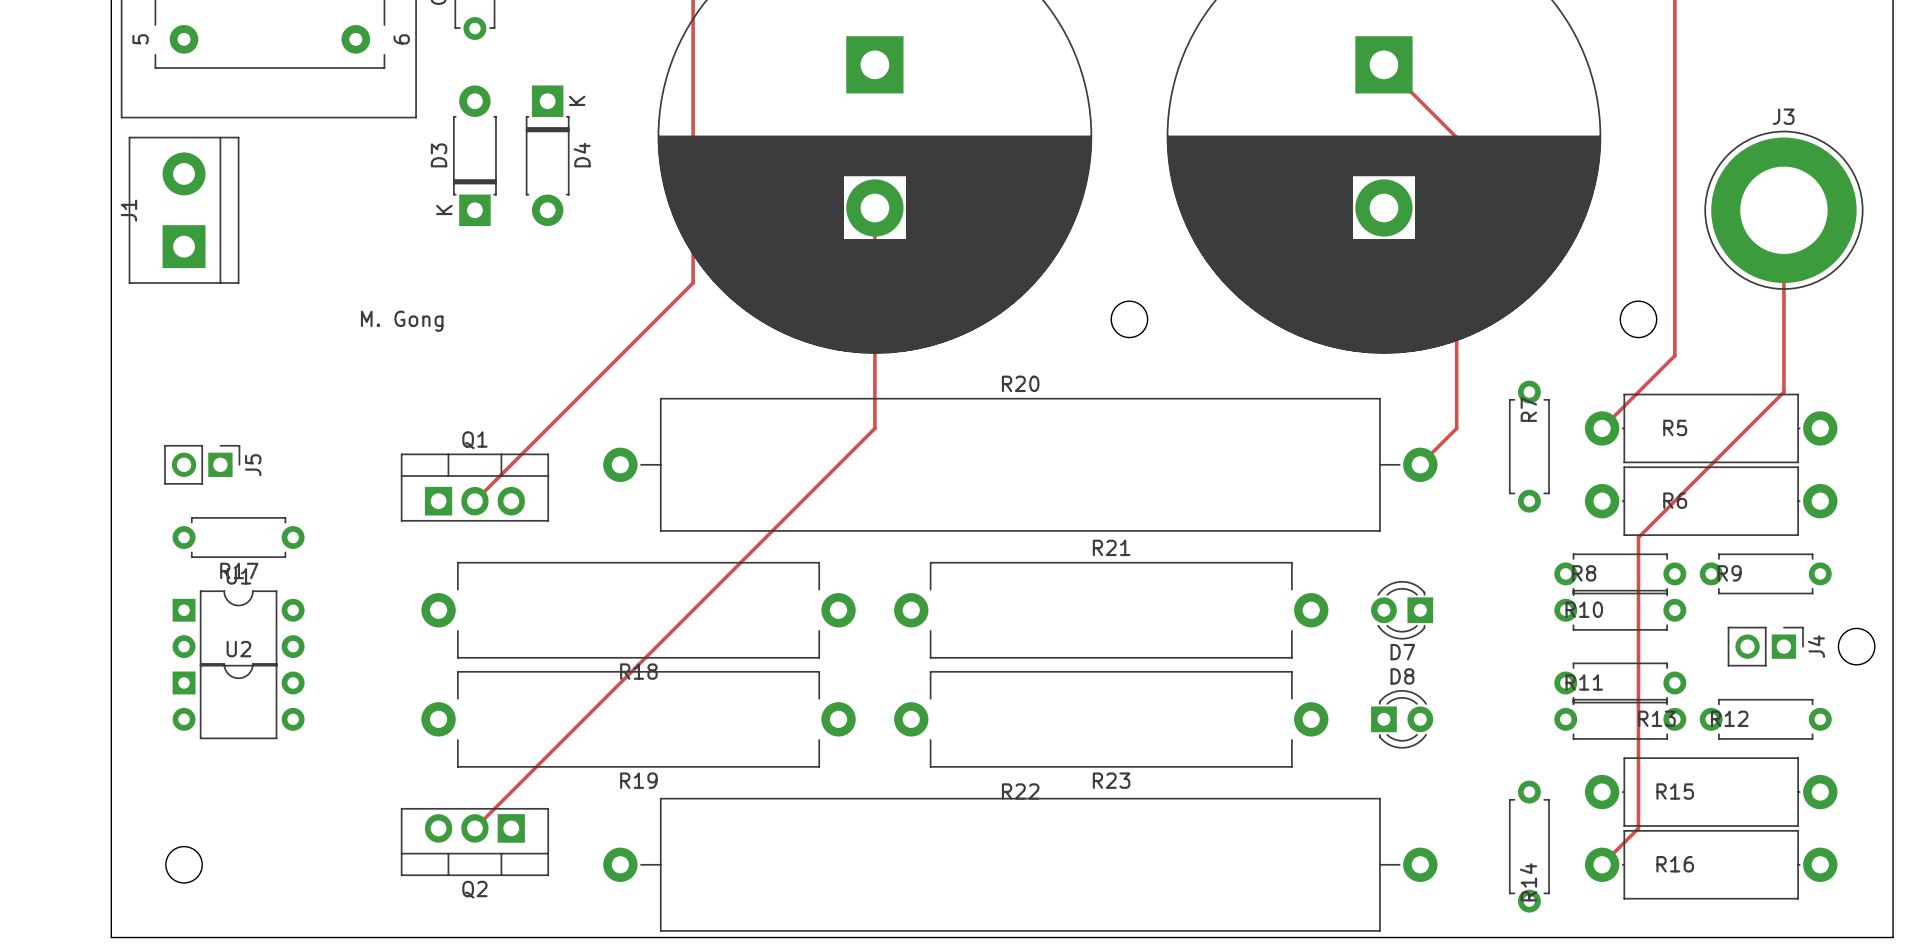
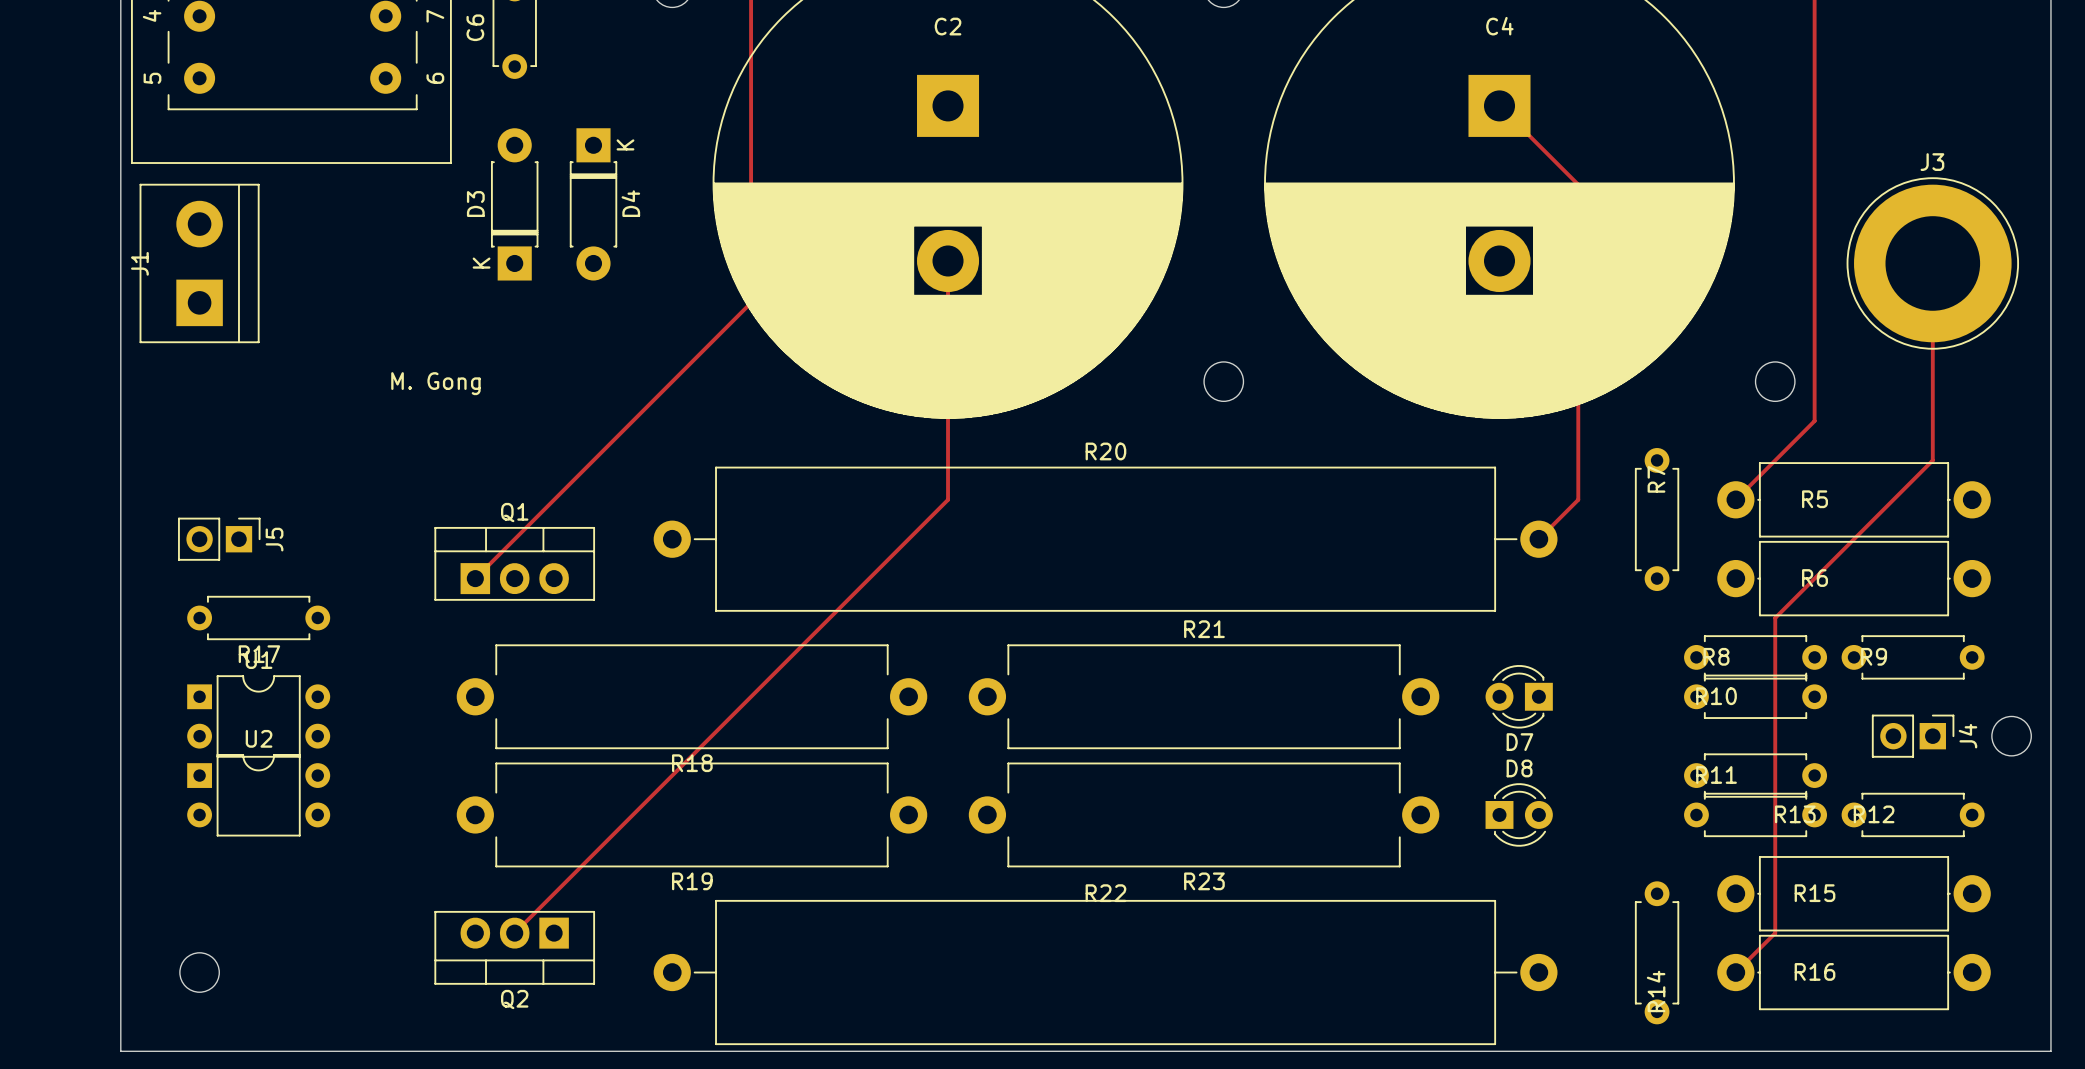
track: (693, 246) (693, 283) (474, 501) -> (751, 302) (475, 578)

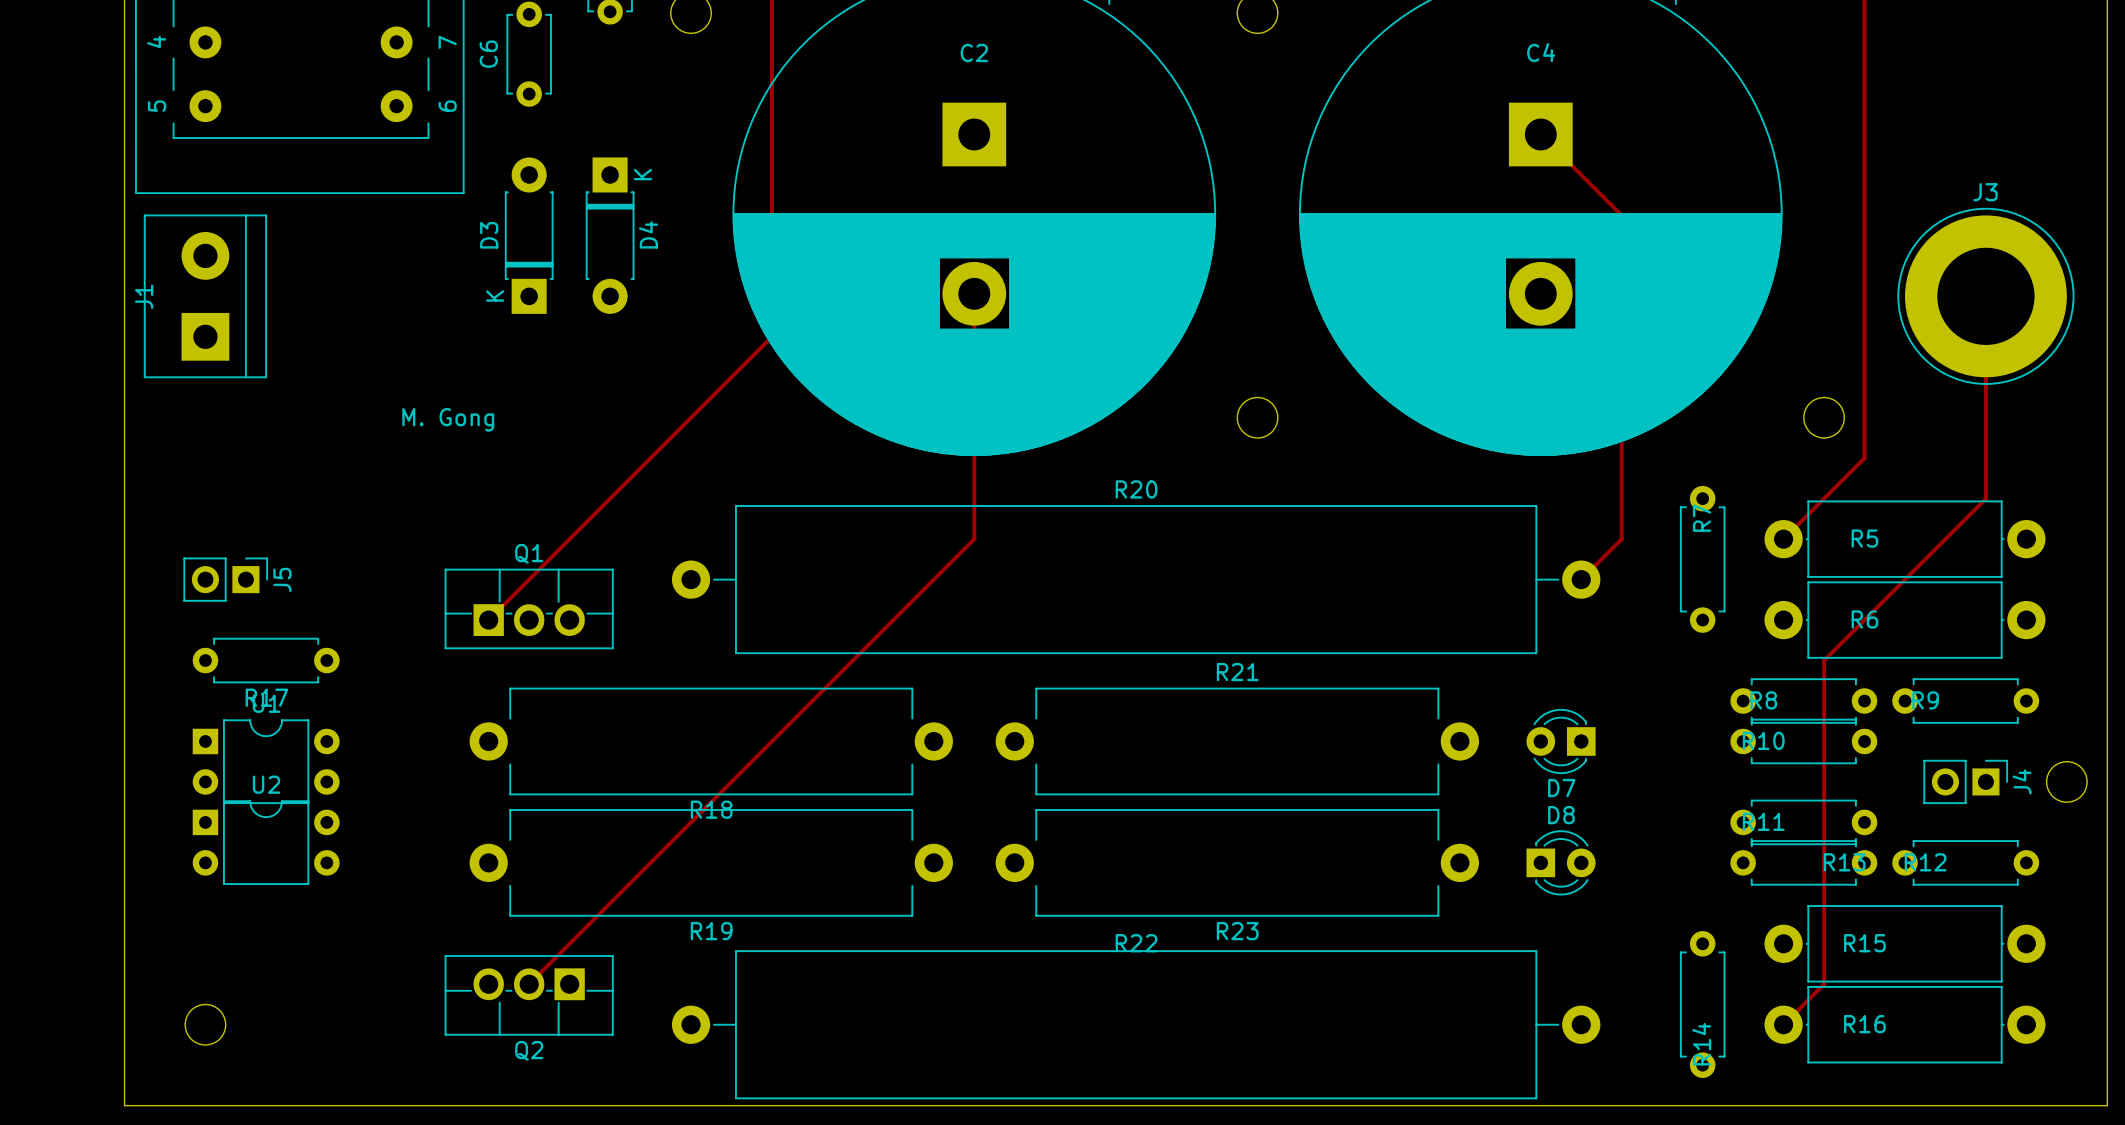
Q1 footprint: [434, 526, 596, 601] -> [444, 568, 614, 650]
Q2 footprint: [434, 910, 596, 985] -> [444, 955, 614, 1036]

